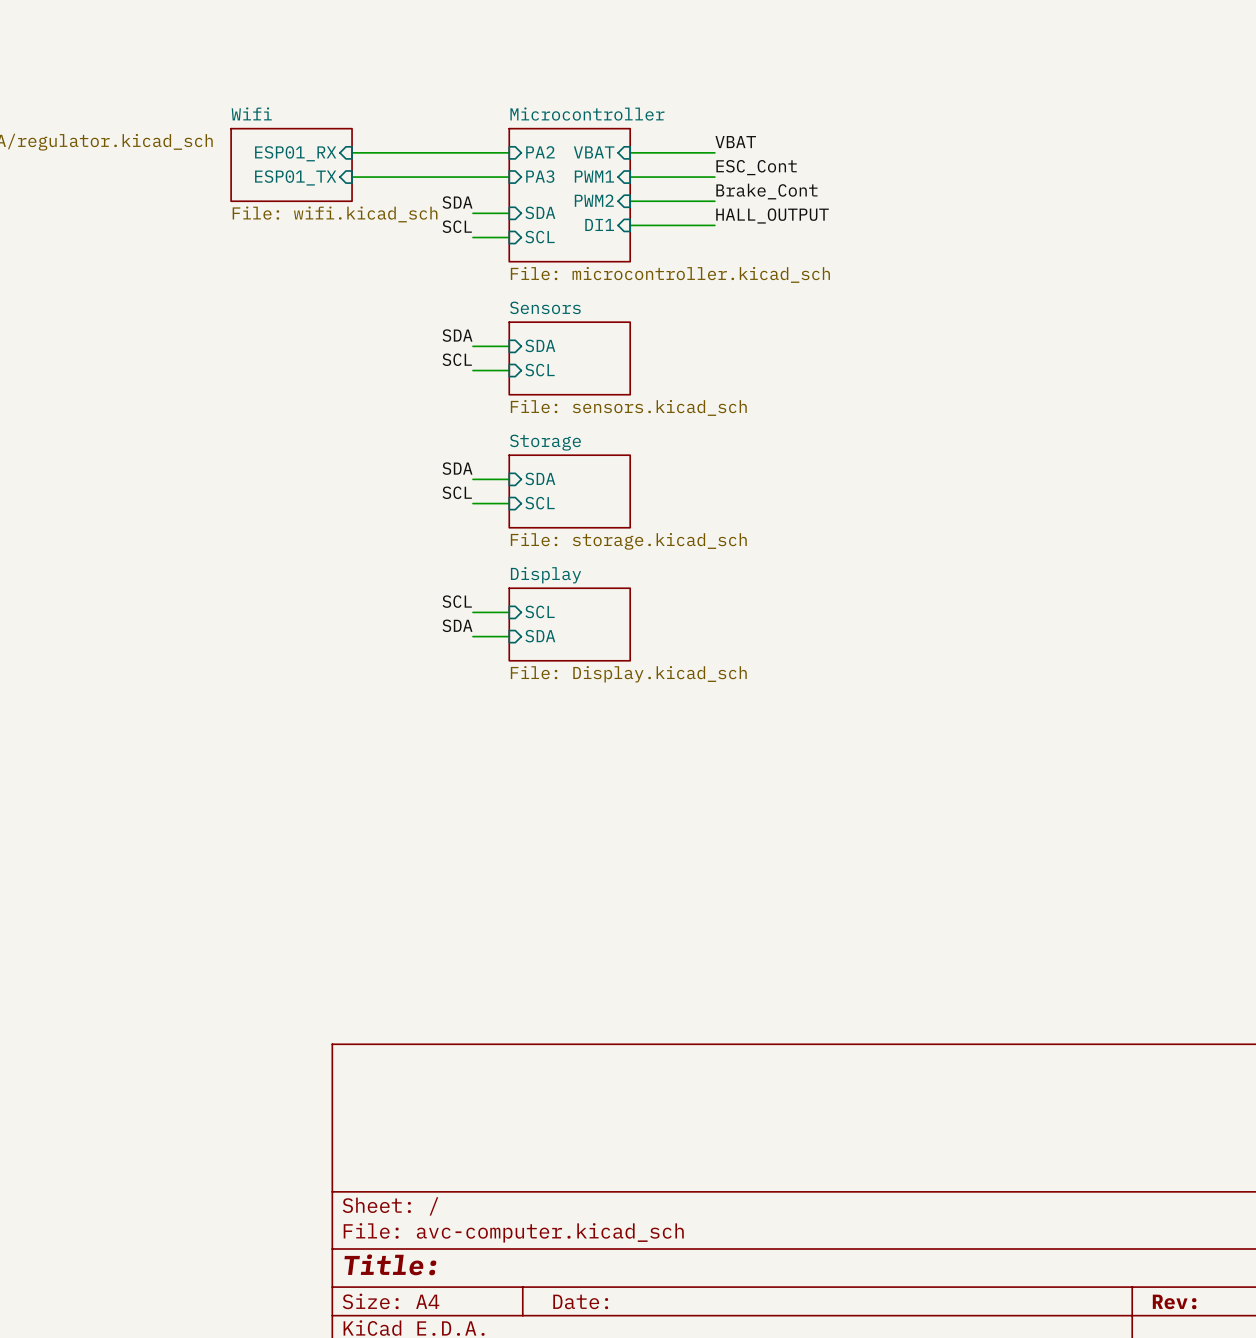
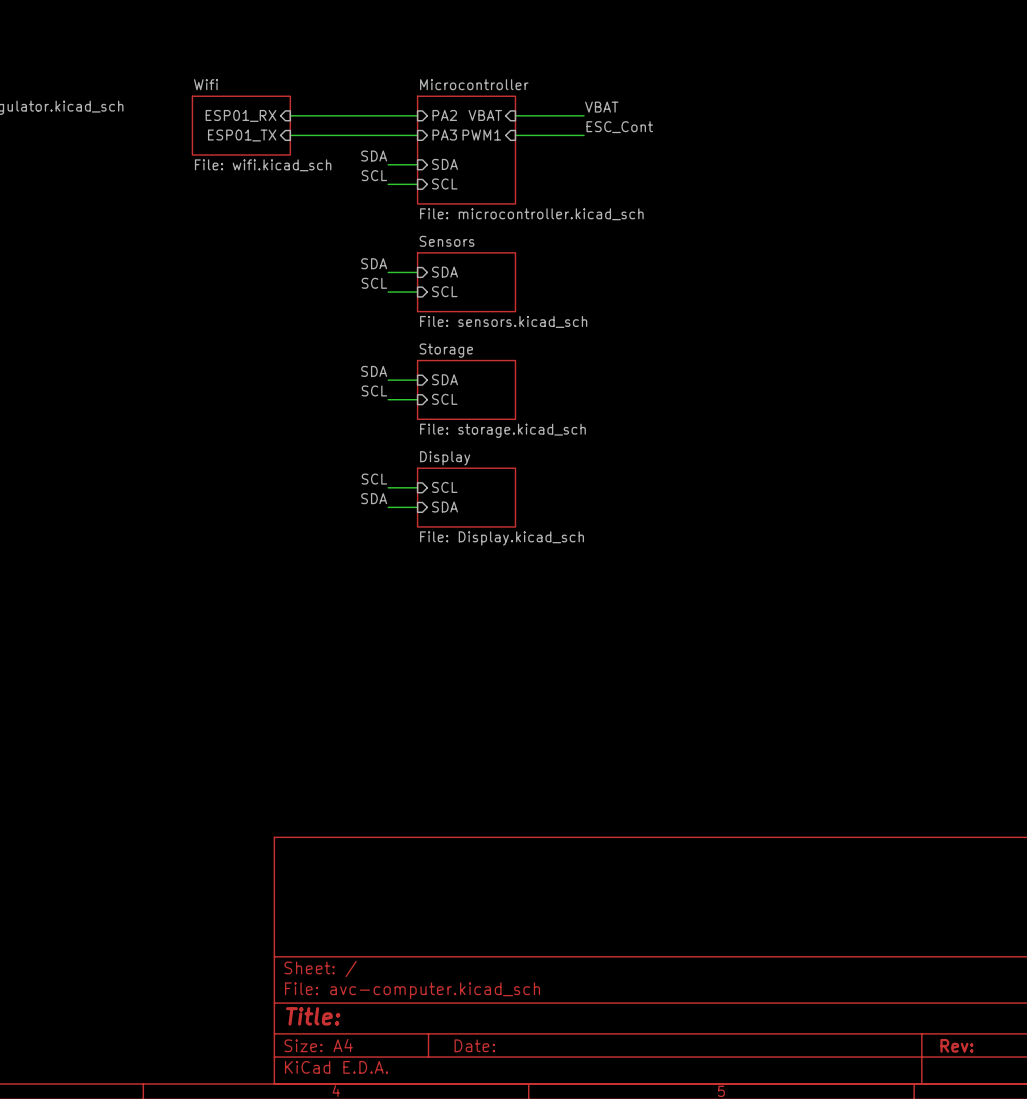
label: Brake_Cont (766, 191) -> none
sheet pin: PWM2 (594, 200) -> none
wire: (630, 201) (714, 201) -> none
label: HALL_OUTPUT (772, 215) -> none
sheet pin: DI1 (599, 224) -> none
wire: (630, 225) (714, 225) -> none

